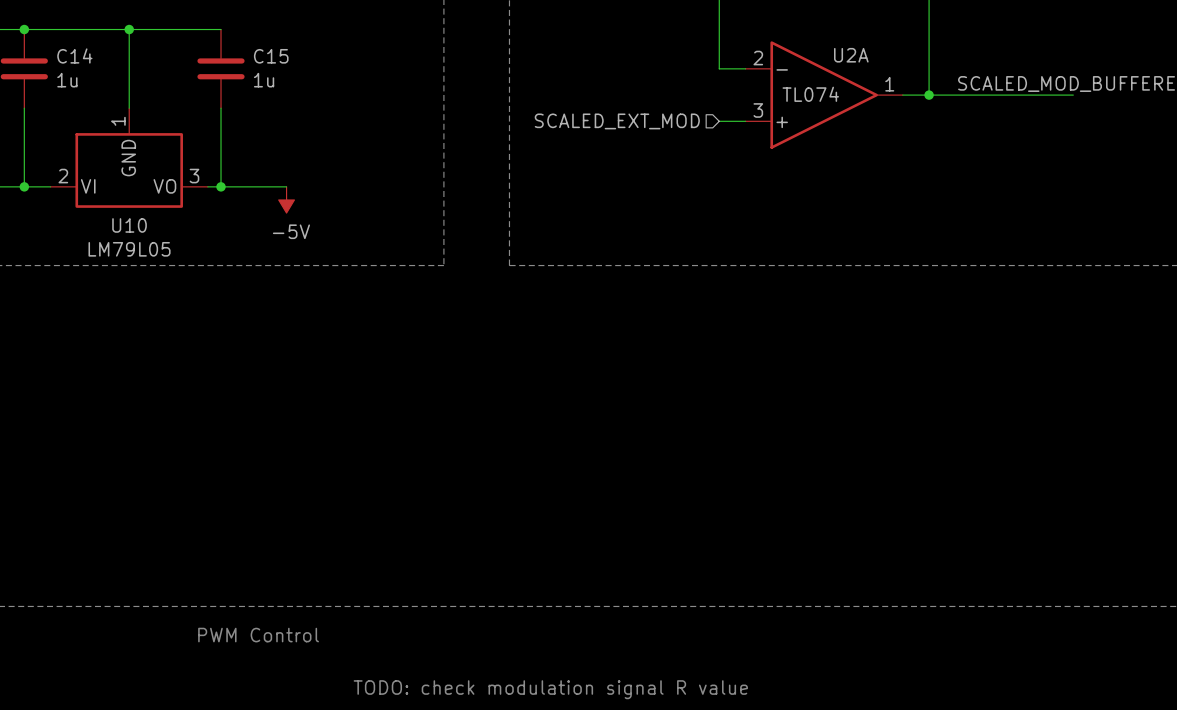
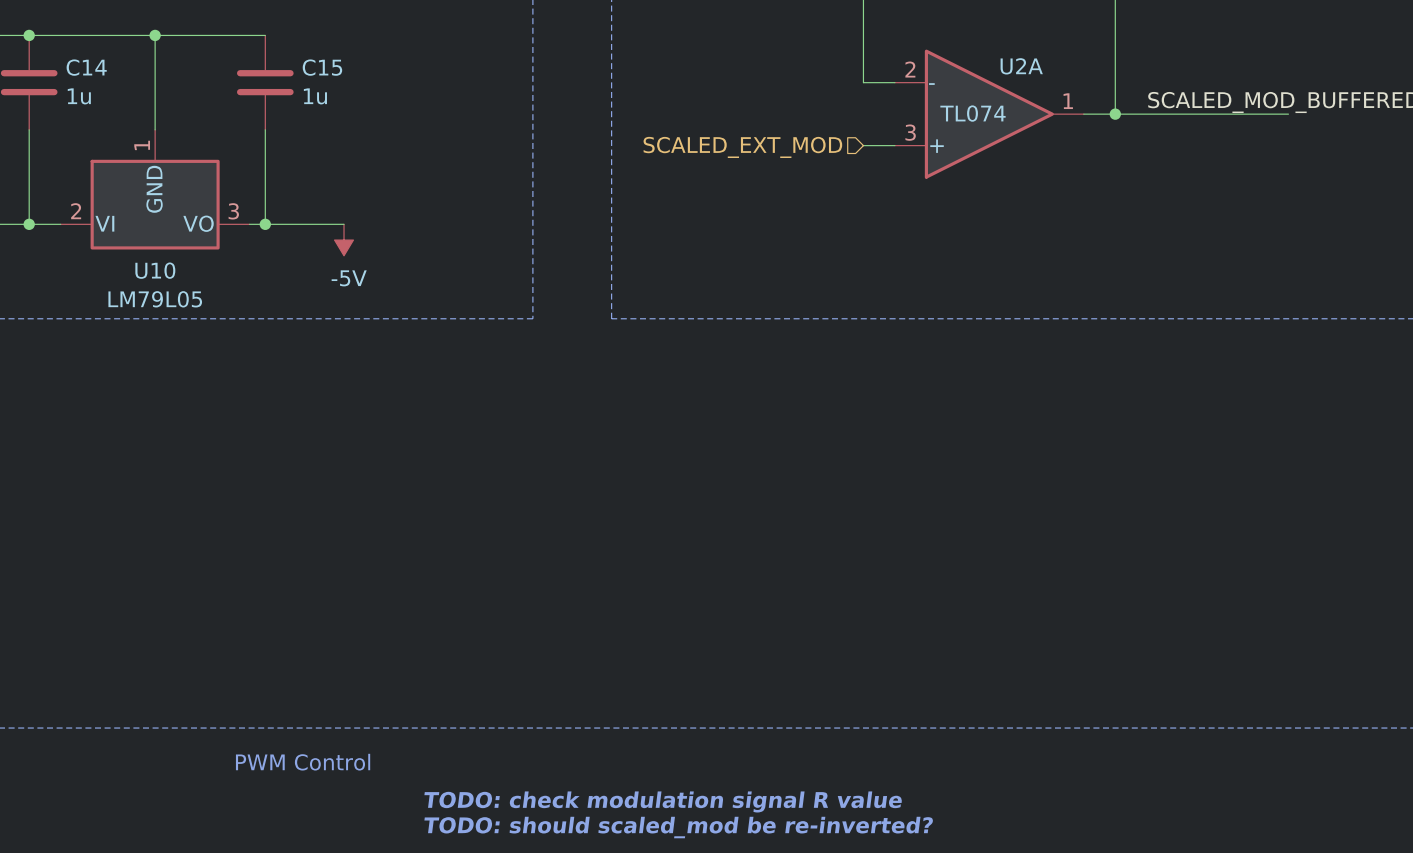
text: none -> TODO: check modulation signal R value (663, 801)
text: TODO: check modulation signal R value (550, 689) -> TODO: should scaled_mod be re-inverted? (678, 827)

